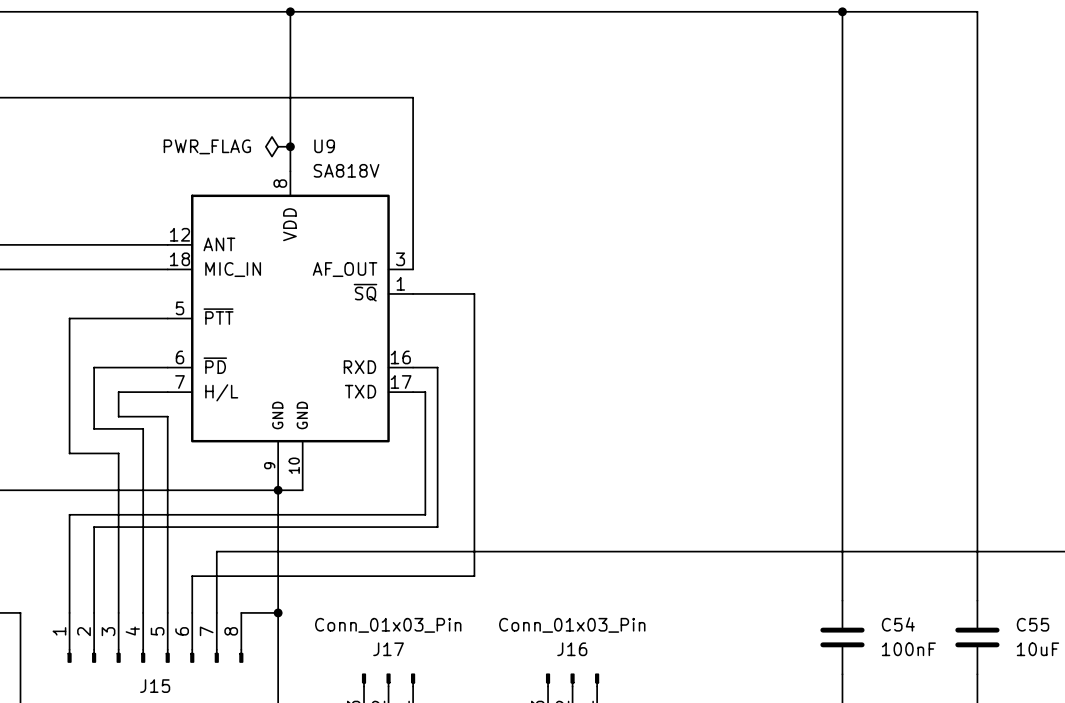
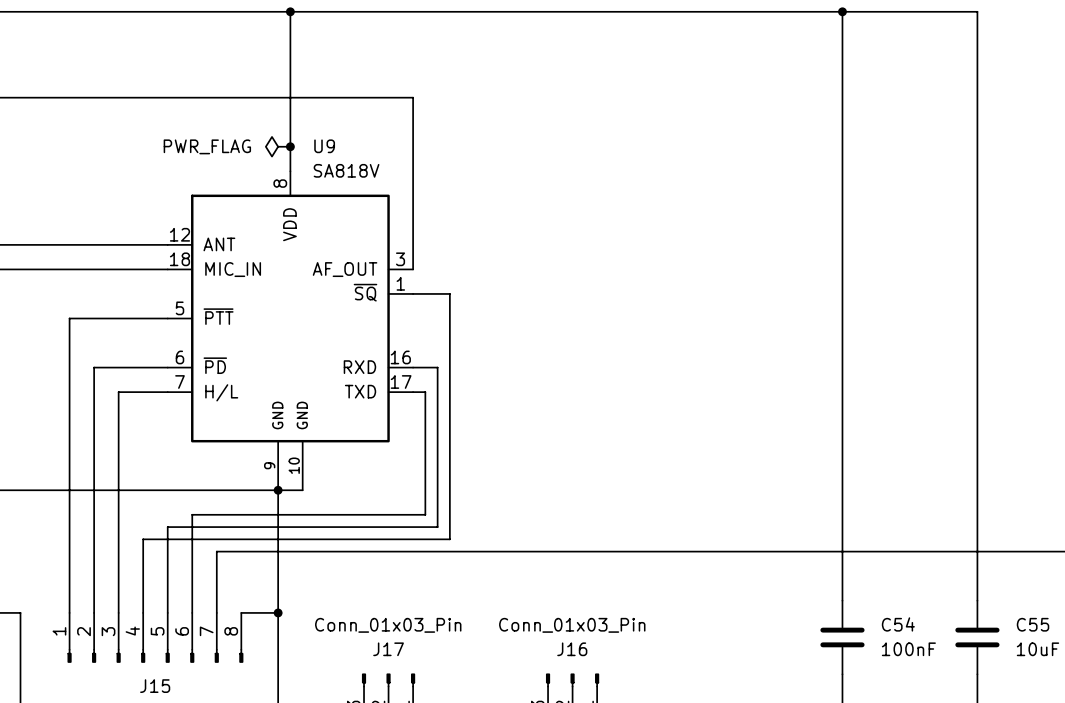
wire: (449, 293) (474, 293) (474, 576) (192, 576) -> (449, 293) (449, 539) (143, 539)
wire: (118, 416) (167, 416) (167, 527) (94, 527) -> (94, 428) (94, 527)
wire: (94, 428) (143, 428) (143, 539) -> none
wire: (69, 453) (118, 453) -> (118, 416) (118, 453)
wire: (69, 514) (192, 514) -> (69, 514) (69, 453)
wire: none -> (192, 514) (192, 576)

